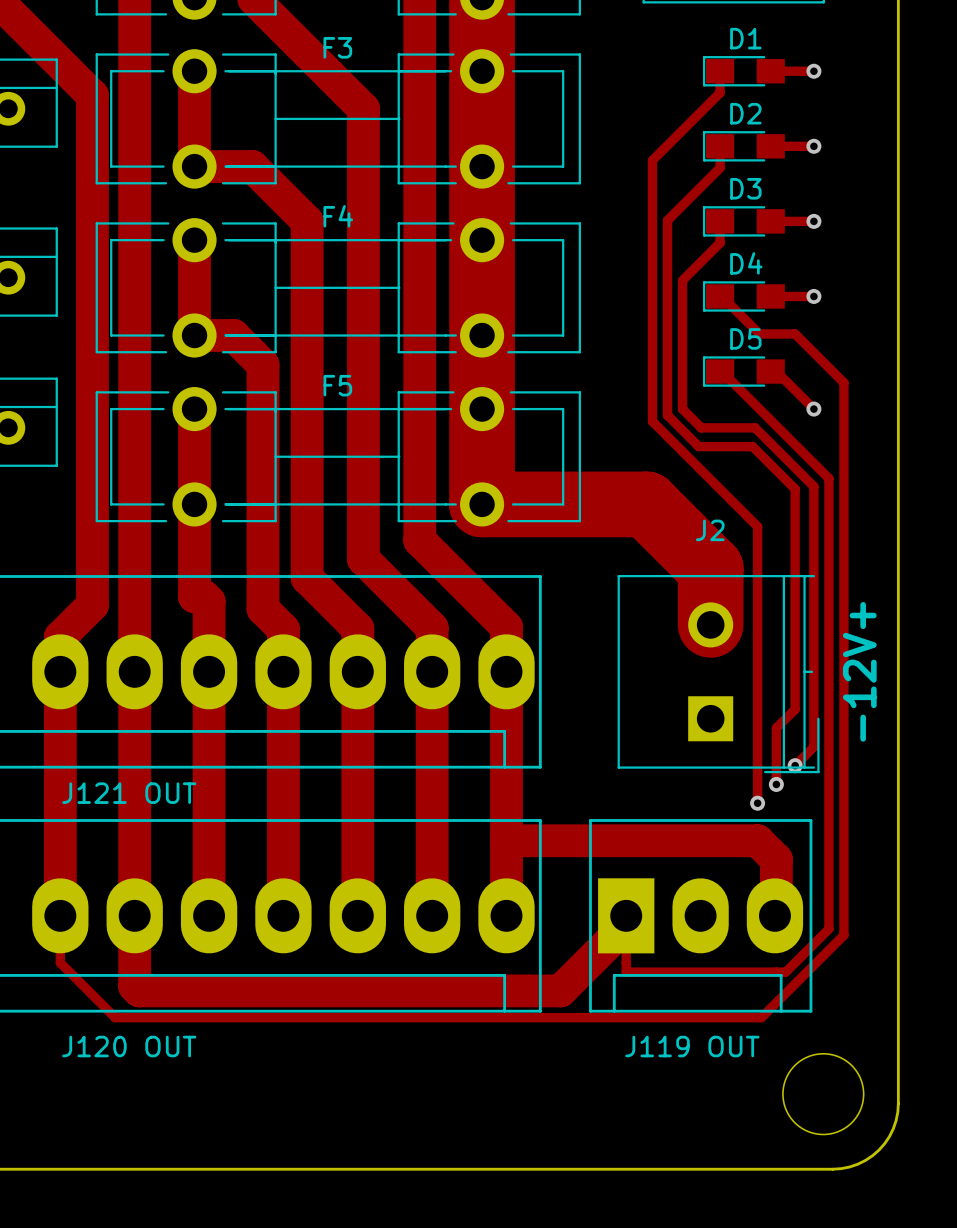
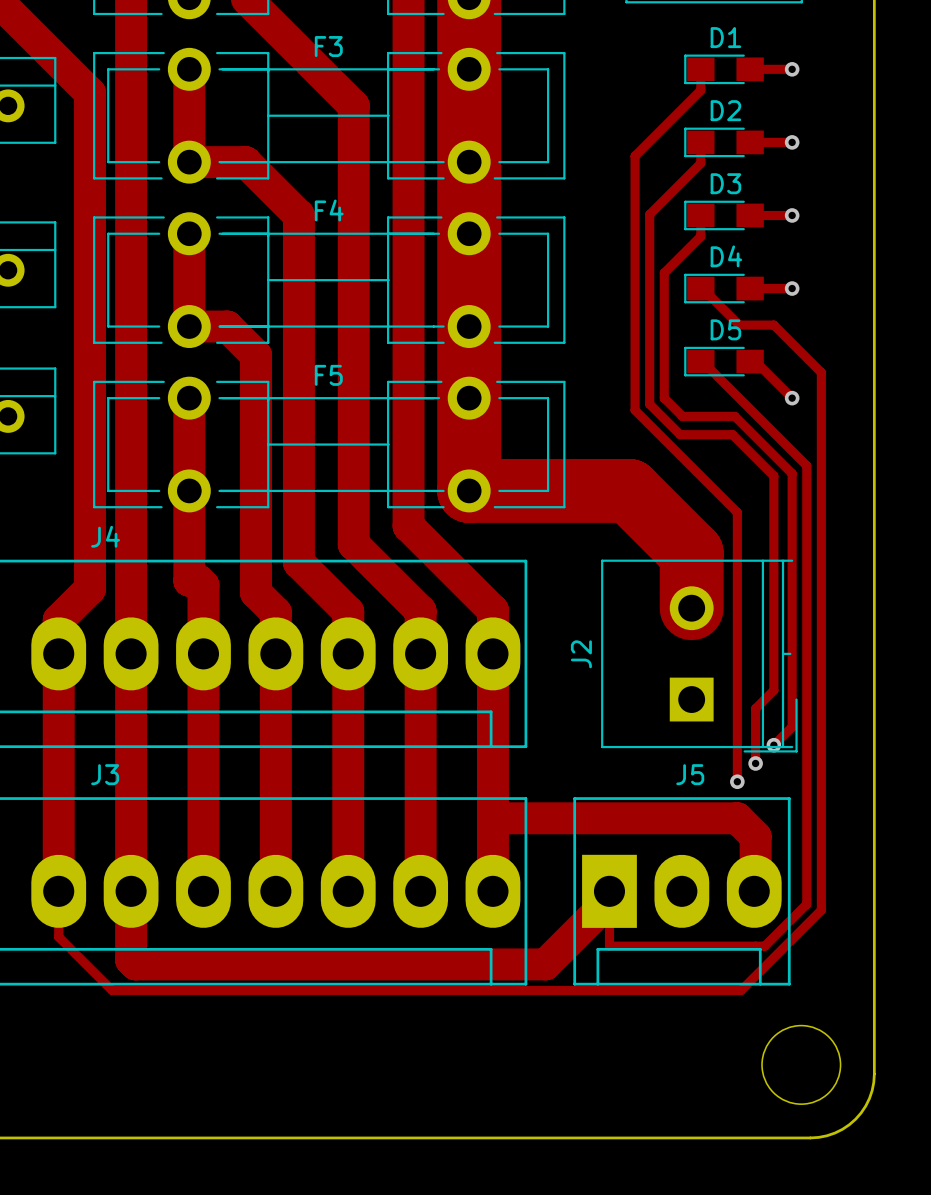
J2 name rotation: 0° (710, 530) -> 90° counterclockwise (581, 654)
J2 name position: J2 (710, 530) -> J2 (581, 654)
text: -12V+ (859, 671) -> none
J121 OUT name: J121 OUT (129, 793) -> J4 (105, 536)
J120 OUT name: J120 OUT (129, 1046) -> J3 (105, 774)
J119 OUT name: J119 OUT (692, 1046) -> J5 (690, 774)

